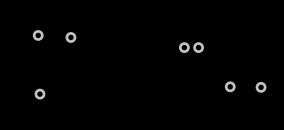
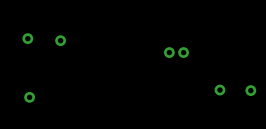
via: (184, 47) -> none
via: (198, 47) -> none
via: none -> (169, 52)
via: none -> (183, 52)

